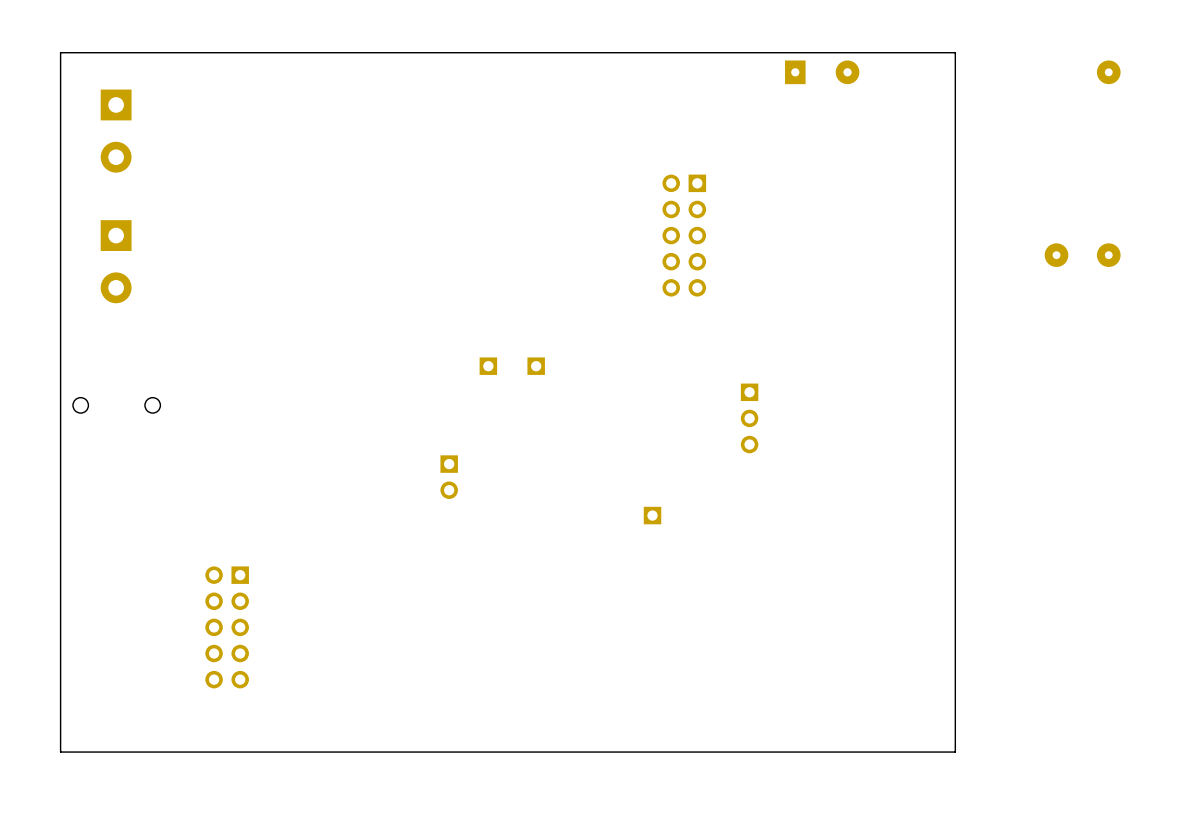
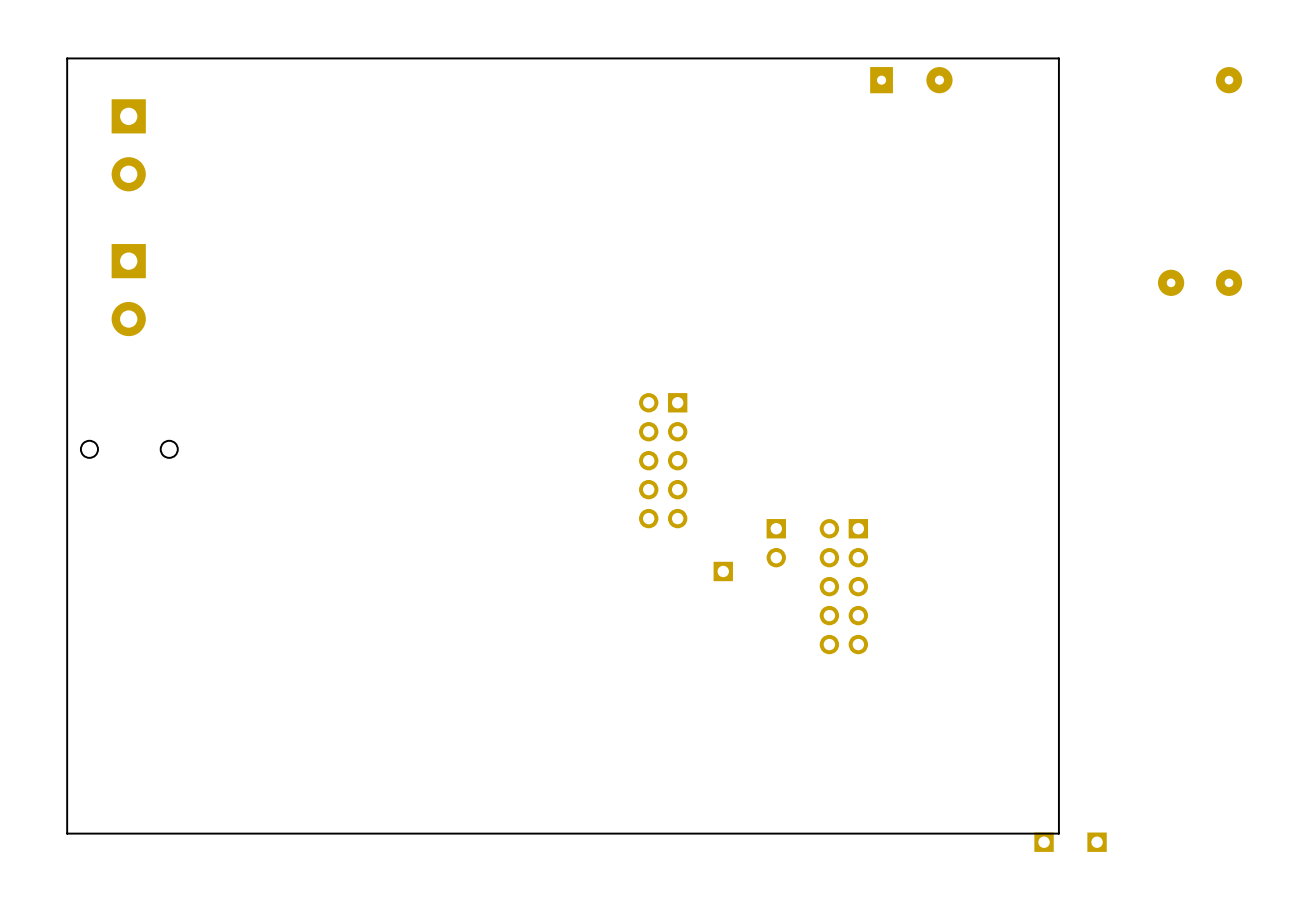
part: (684, 235) -> none
part: (488, 366) -> none
part: (536, 366) -> none
part: none -> (663, 460)
part: (749, 418) -> none
part position: (449, 477) -> (776, 543)
part: none -> (843, 586)
part: (227, 627) -> none
part: none -> (1044, 842)
part: none -> (1097, 842)

